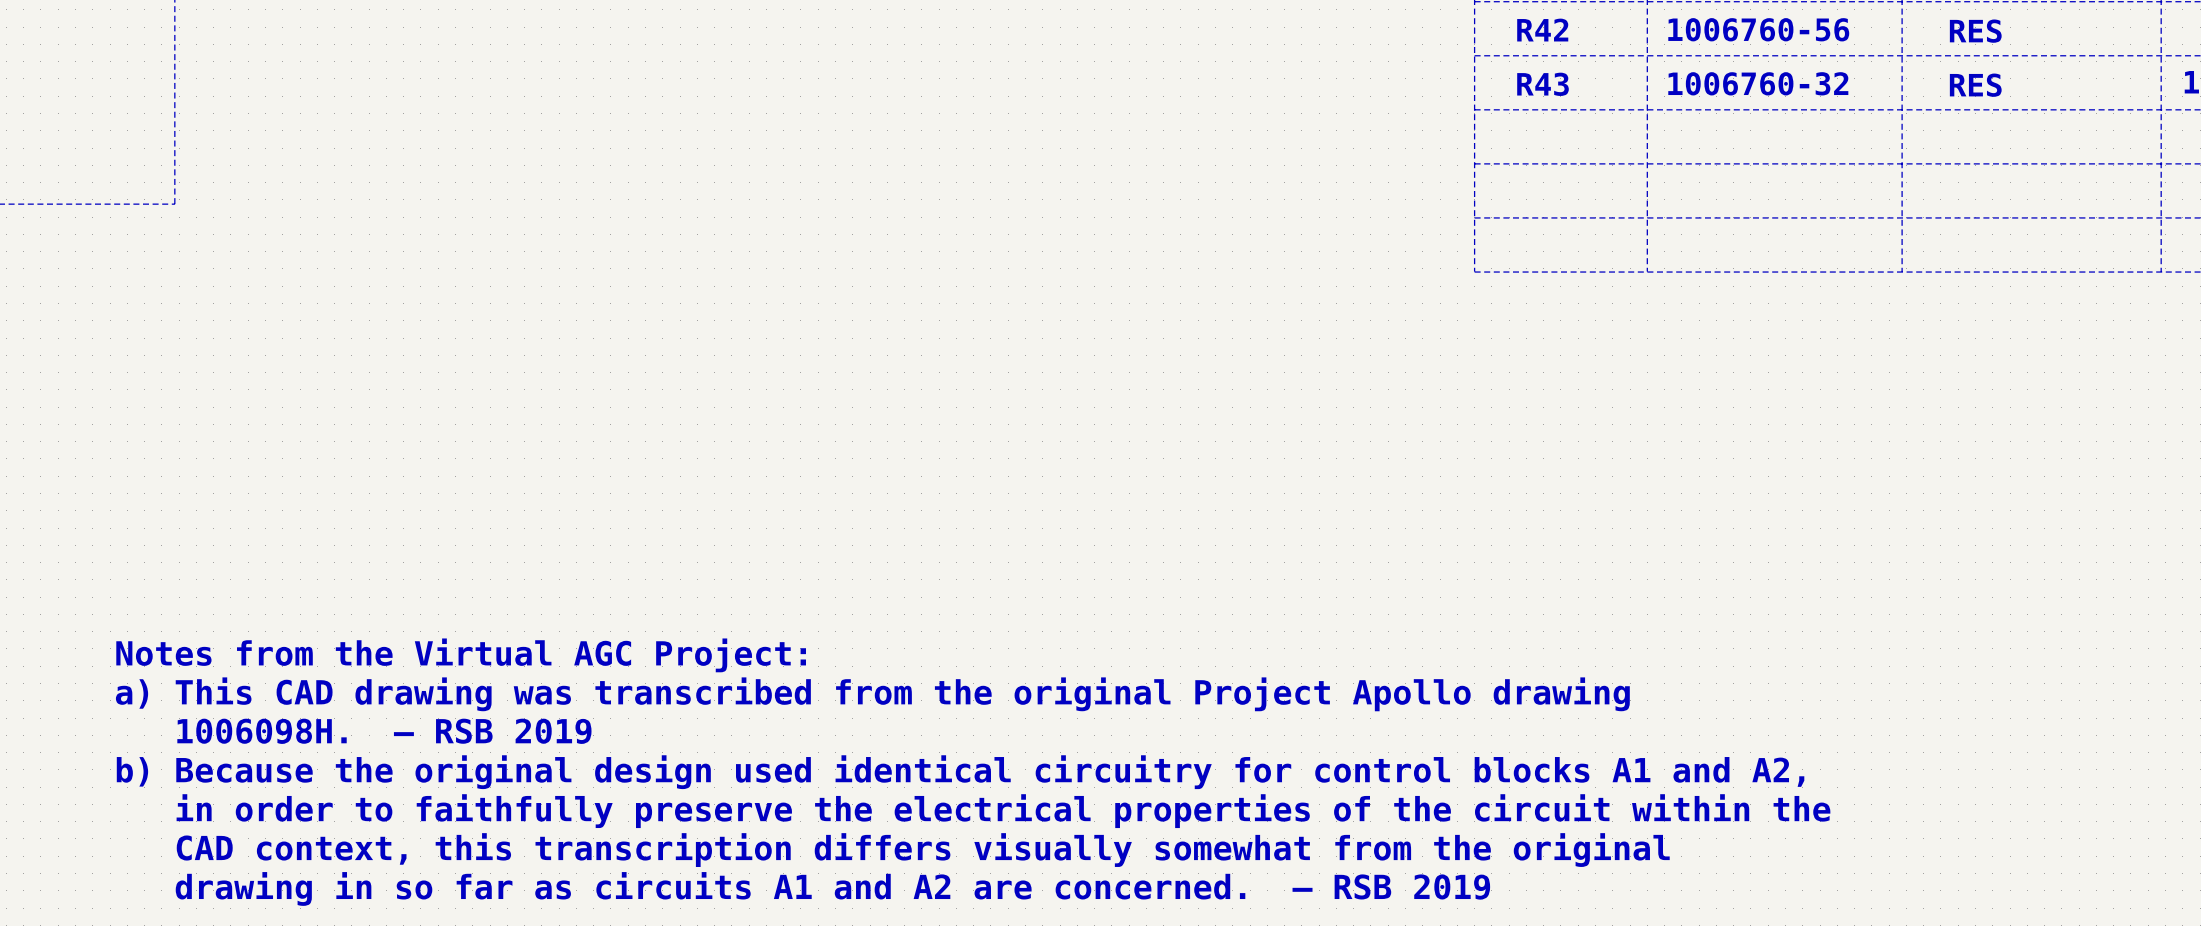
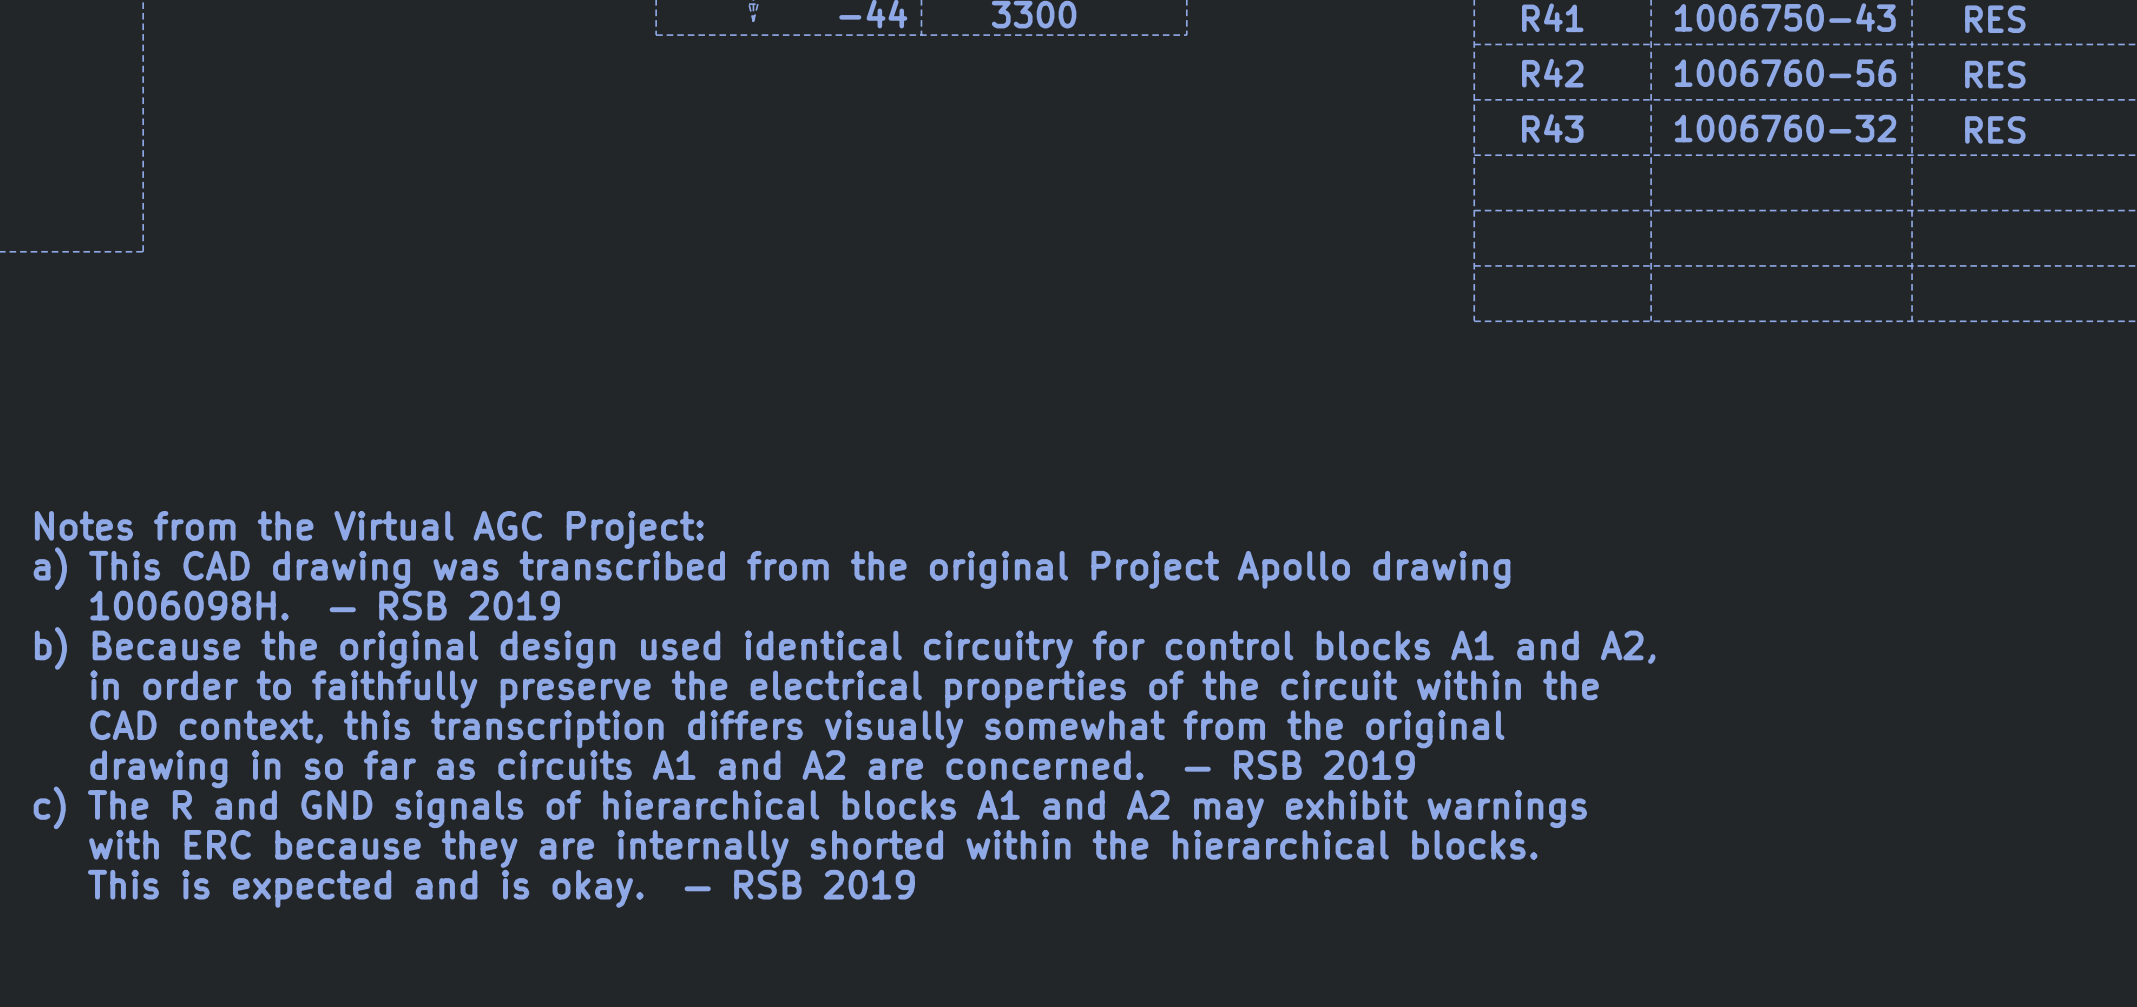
text: none -> Notes from the Virtual AGC Project: (369, 529)
text: none -> a) This CAD drawing was transcribed from the original Project Apollo drawing (772, 568)
text: none -> 1006098H. — RSB 2019 (325, 605)
text: none -> b) Because the original design used identical circuitry for control blocks A1 and A2, (845, 648)
text: none -> in order to faithfully preserve the electrical properties of the circuit within the (844, 689)
text: Notes from the Virtual AGC Project: (461, 655) -> none
text: none -> CAD context, this transcription differs visually somewhat from the original (797, 729)
text: a) This CAD drawing was transcribed from the original Project Apollo drawing (872, 694) -> none
text: none -> drawing in so far as circuits A1 and A2 are concerned. — RSB 2019 (752, 769)
text: 1006098H. — RSB 2019 (384, 731) -> none
text: none -> c) The R and GND signals of hierarchical blocks A1 and A2 may exhibit warnings (810, 807)
text: b) Because the original design used identical circuitry for control blocks A1 and A2, (960, 772) -> none
text: none -> with ERC because they are internally shorted within the hierarchical blocks. (813, 848)
text: in order to faithfully preserve the electrical properties of the circuit within the (1003, 811) -> none
text: none -> This is expected and is okay. — RSB 2019 (501, 888)
text: CAD context, this transcription differs visually somewhat from the original (923, 850) -> none
text: drawing in so far as circuits A1 and A2 are concerned. — RSB 2019 (832, 888) -> none

